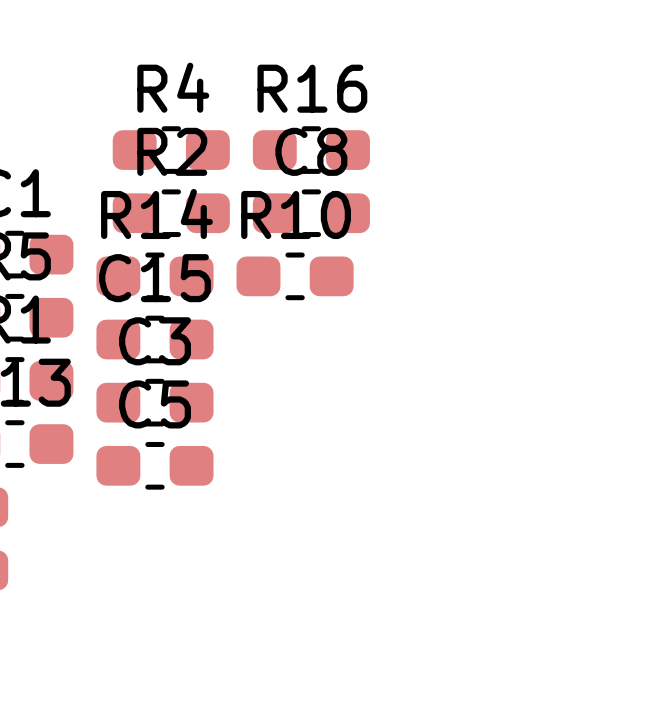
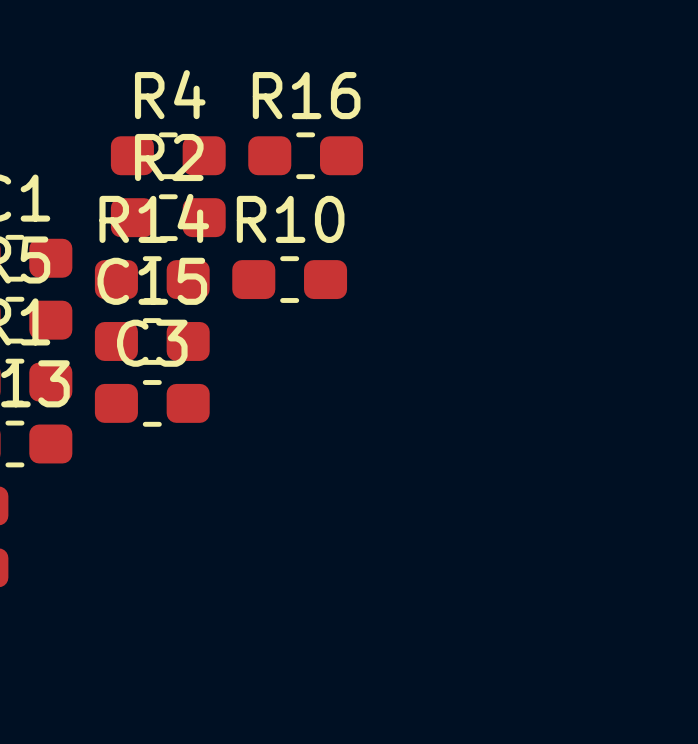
C8: (311, 213) -> none
C5: (154, 465) -> none

